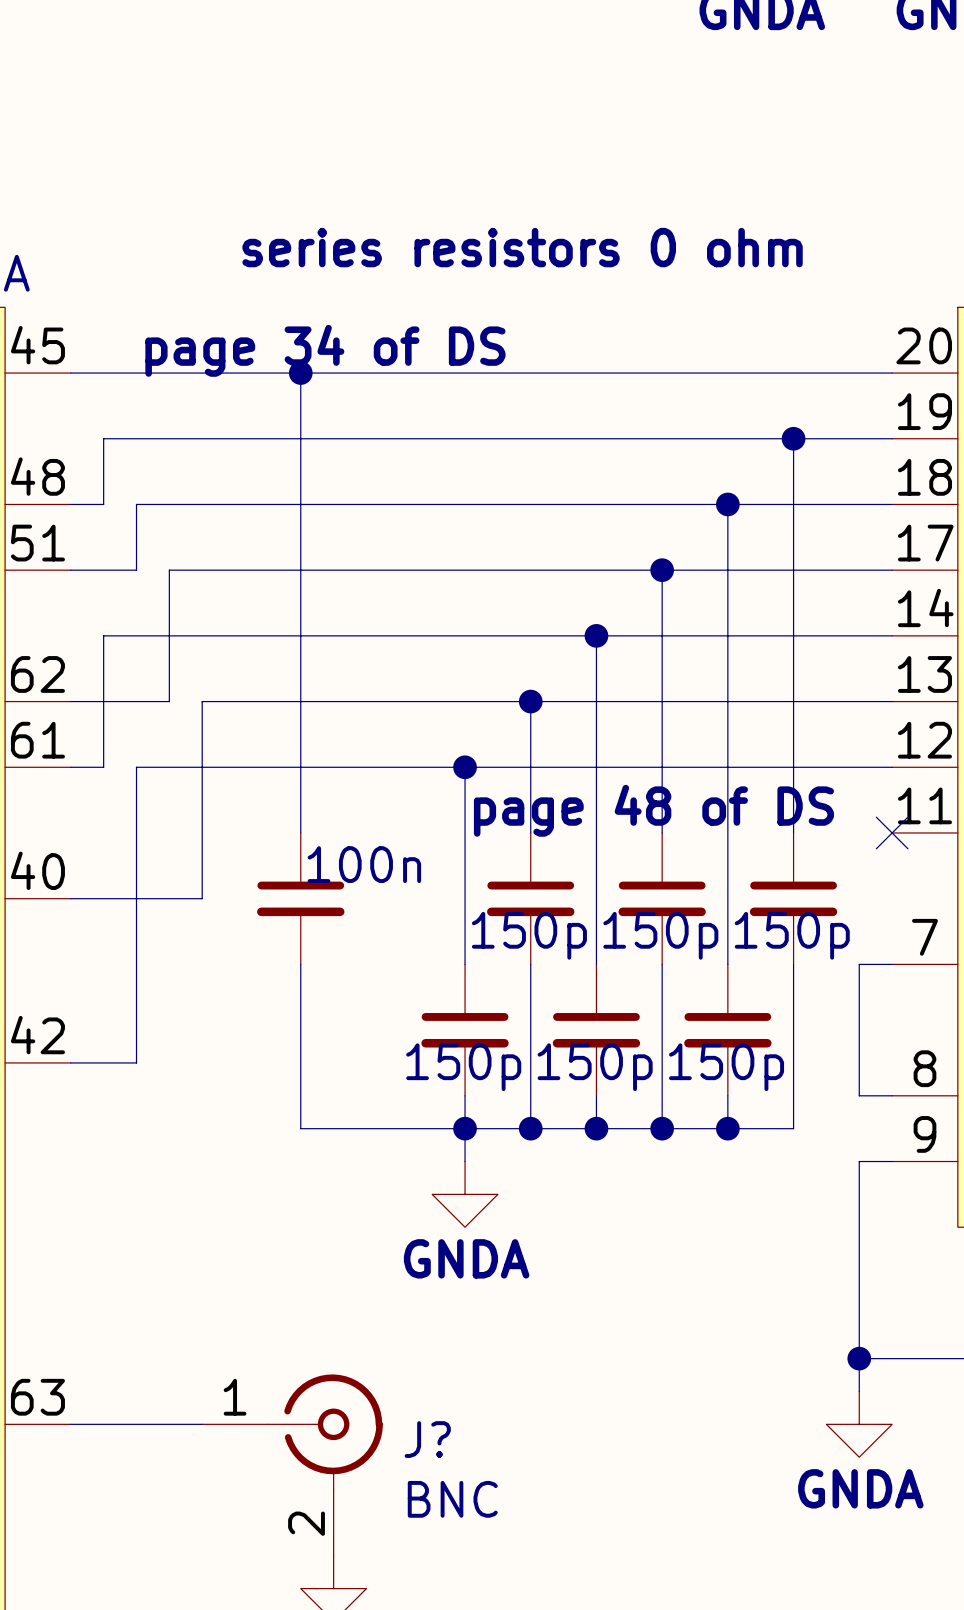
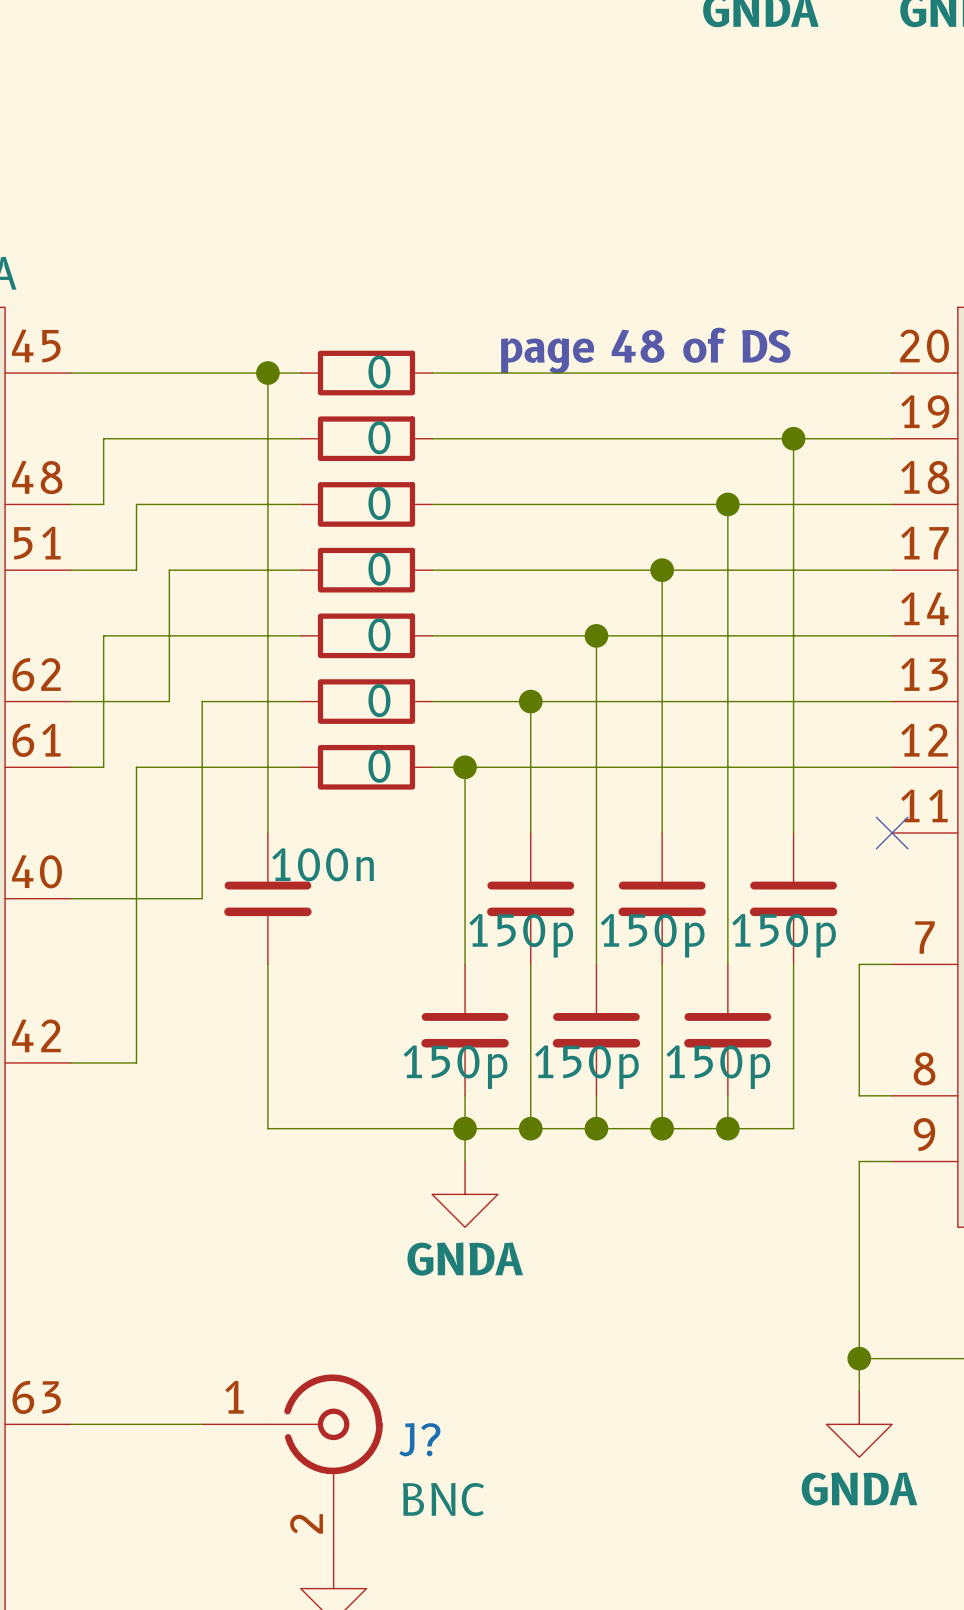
text: series resistors 0 ohm (522, 247) -> none
text: page 34 of DS (325, 350) -> none
wire: none -> (267, 373) (267, 832)
junction position: (300, 373) -> (267, 373)
part: none -> 0 (366, 373)
wire: (432, 373) (300, 373) (300, 832) -> none
wire: (300, 438) (432, 438) -> none
part: none -> 0 (366, 438)
wire: (300, 504) (432, 504) -> none
part: none -> 0 (366, 504)
wire: (300, 570) (432, 570) -> none
part: none -> 0 (366, 570)
wire: (300, 635) (432, 635) -> none
part: none -> 0 (366, 635)
wire: (300, 701) (432, 701) -> none
part: none -> 0 (366, 701)
wire: (300, 767) (432, 767) -> none
part: none -> 0 (366, 767)
text position: page 48 of DS (653, 810) -> page 48 of DS (645, 350)
part position: (300, 898) -> (267, 898)
wire: (300, 964) (300, 1128) -> (267, 964) (267, 1128) (300, 1128)

